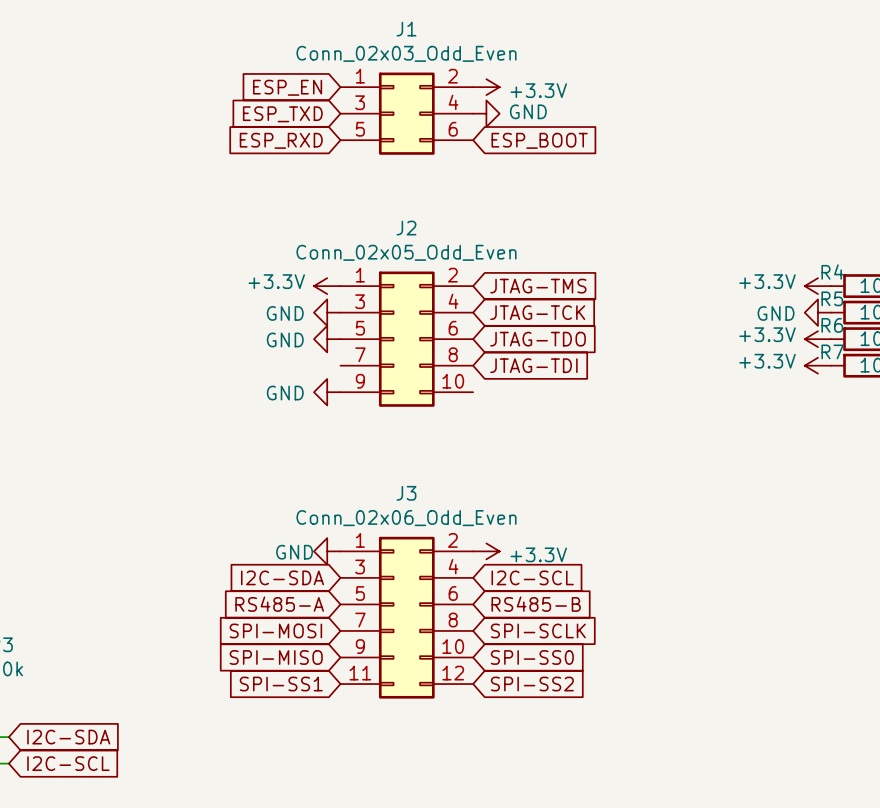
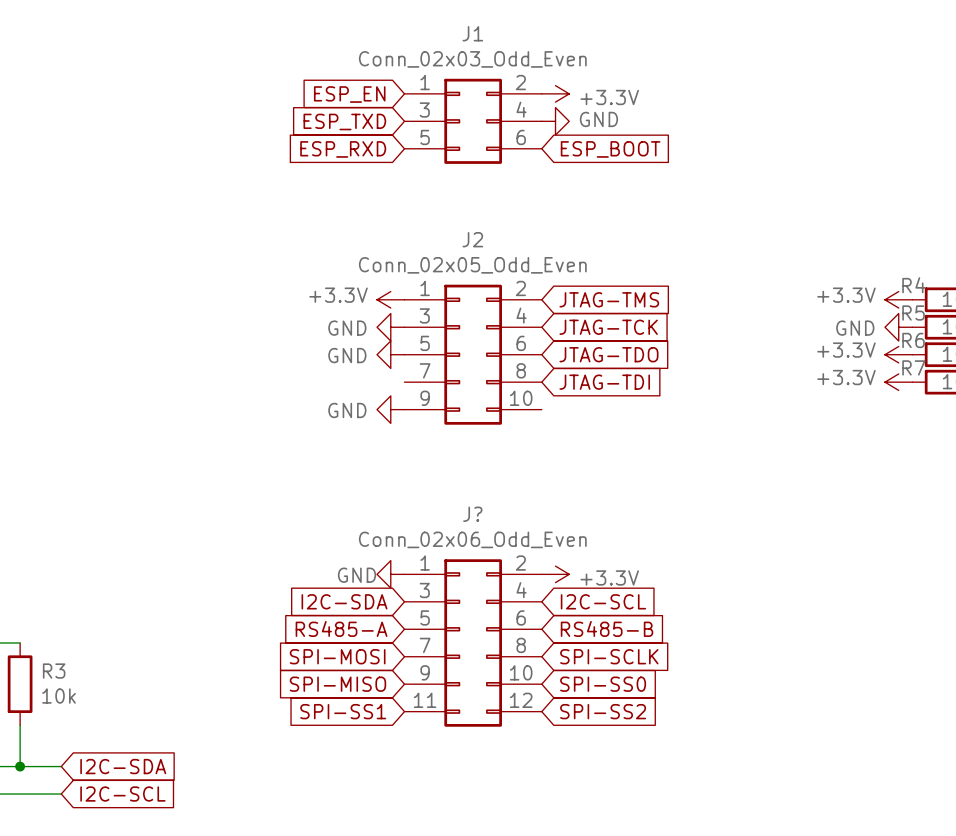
J3 name: J3 (406, 493) -> J? (472, 514)

